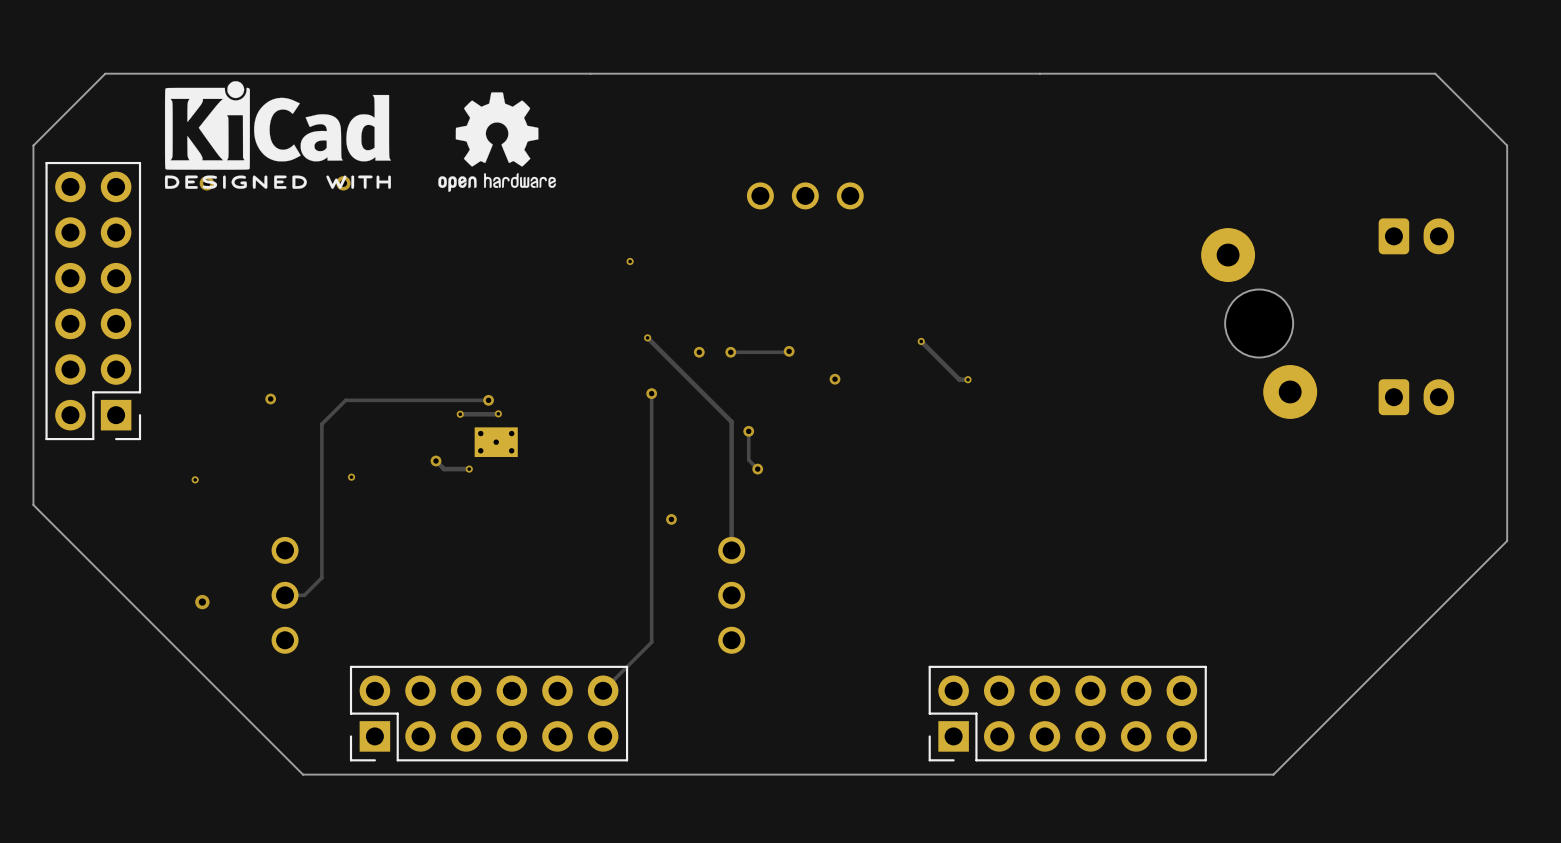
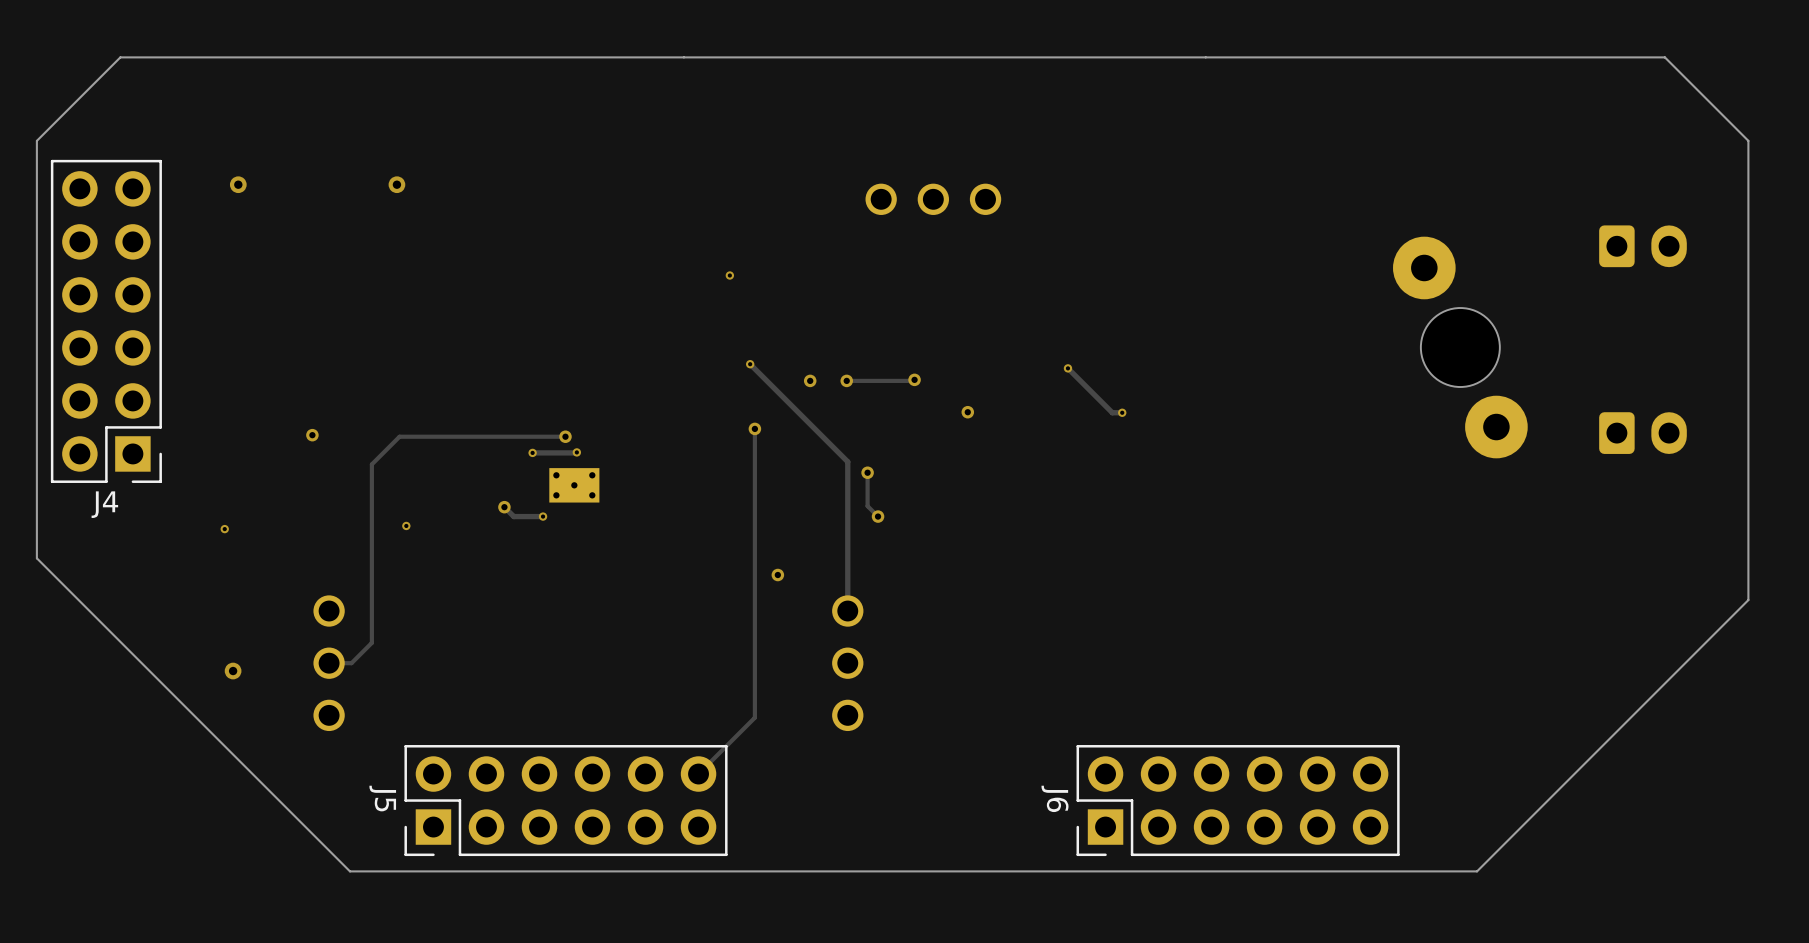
drawing: [164, 81, 391, 189] -> none
drawing: [438, 92, 556, 192] -> none
J4 name: none -> J4 (104, 504)
J5 name: none -> J5 (382, 798)
J6 name: none -> J6 (1055, 798)

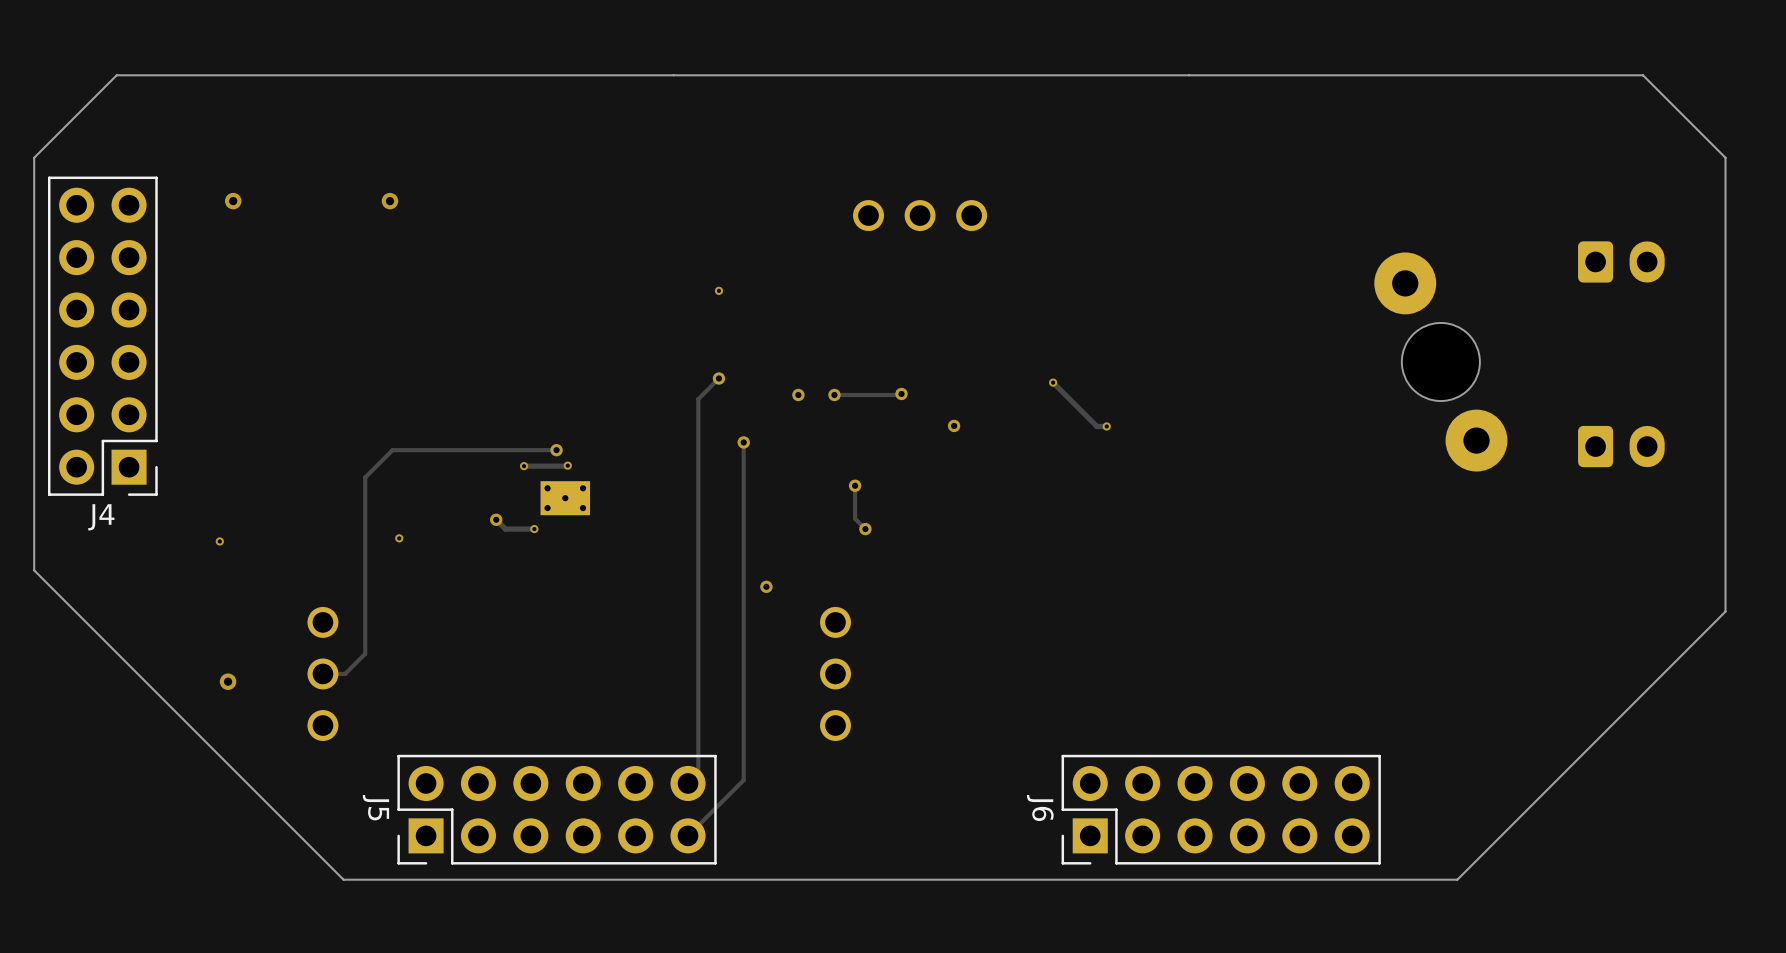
track: none -> (718, 378) (698, 399) (698, 773)
via: none -> (718, 378)
track: (750, 364) (847, 461) (847, 611) -> none
via: (750, 364) -> none
via: (312, 435) -> none
track: (754, 717) (708, 763) -> (743, 727) (743, 780) (688, 835)

